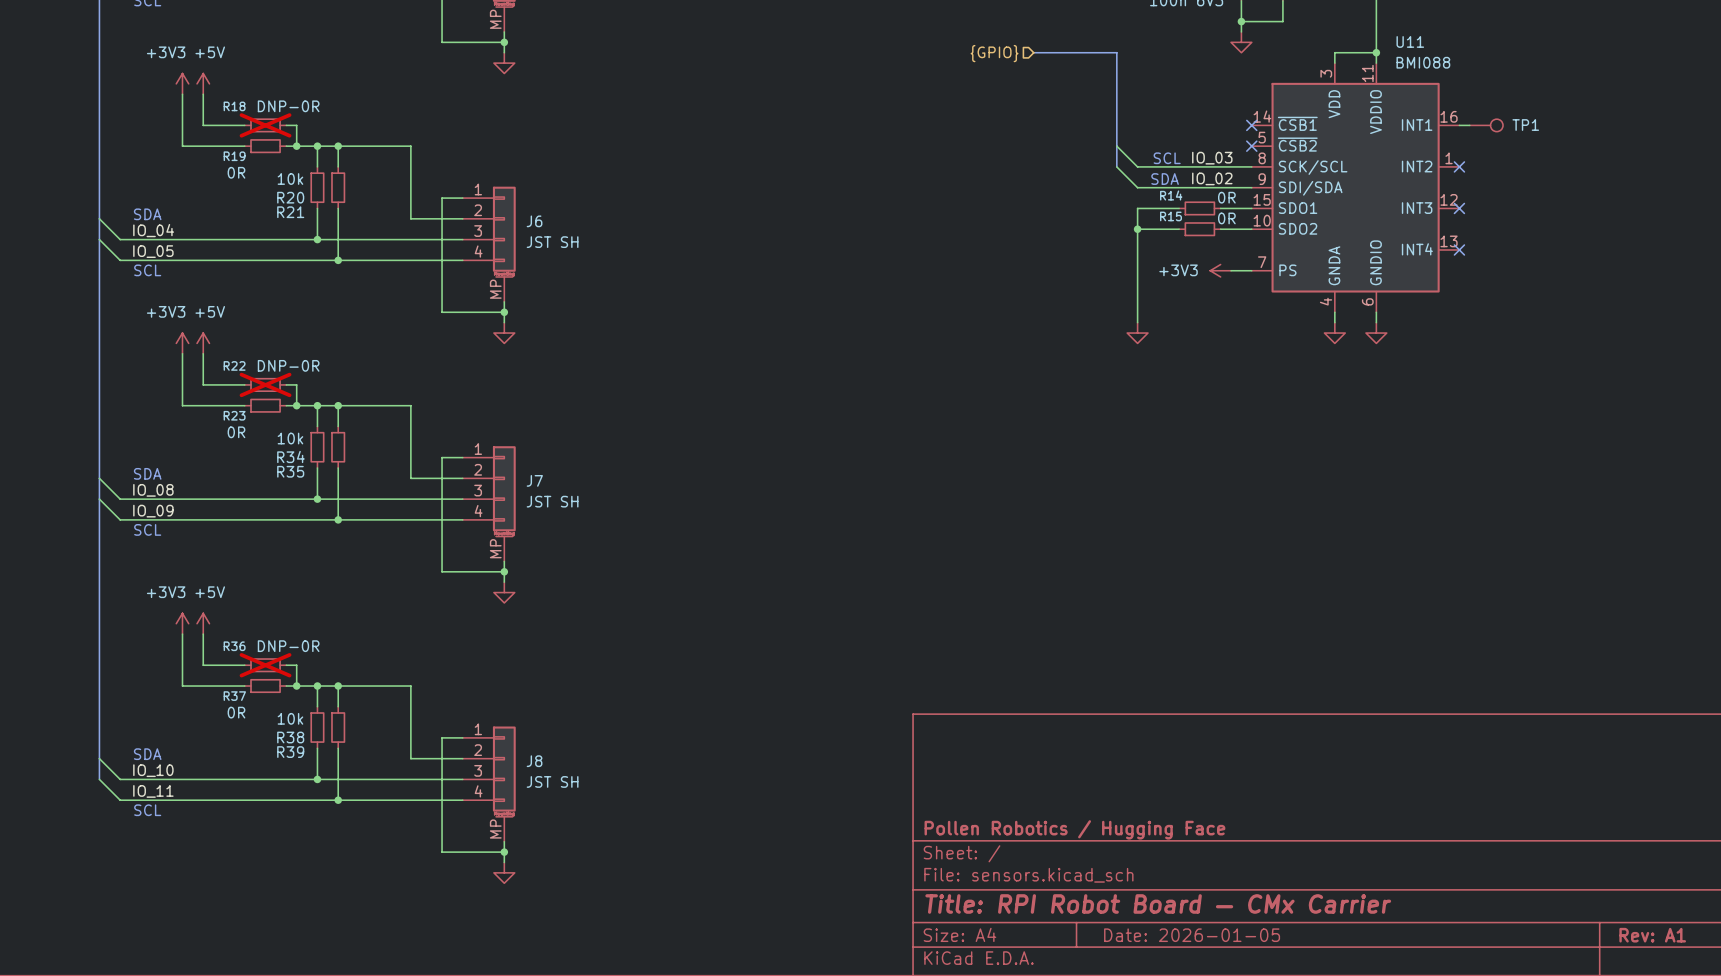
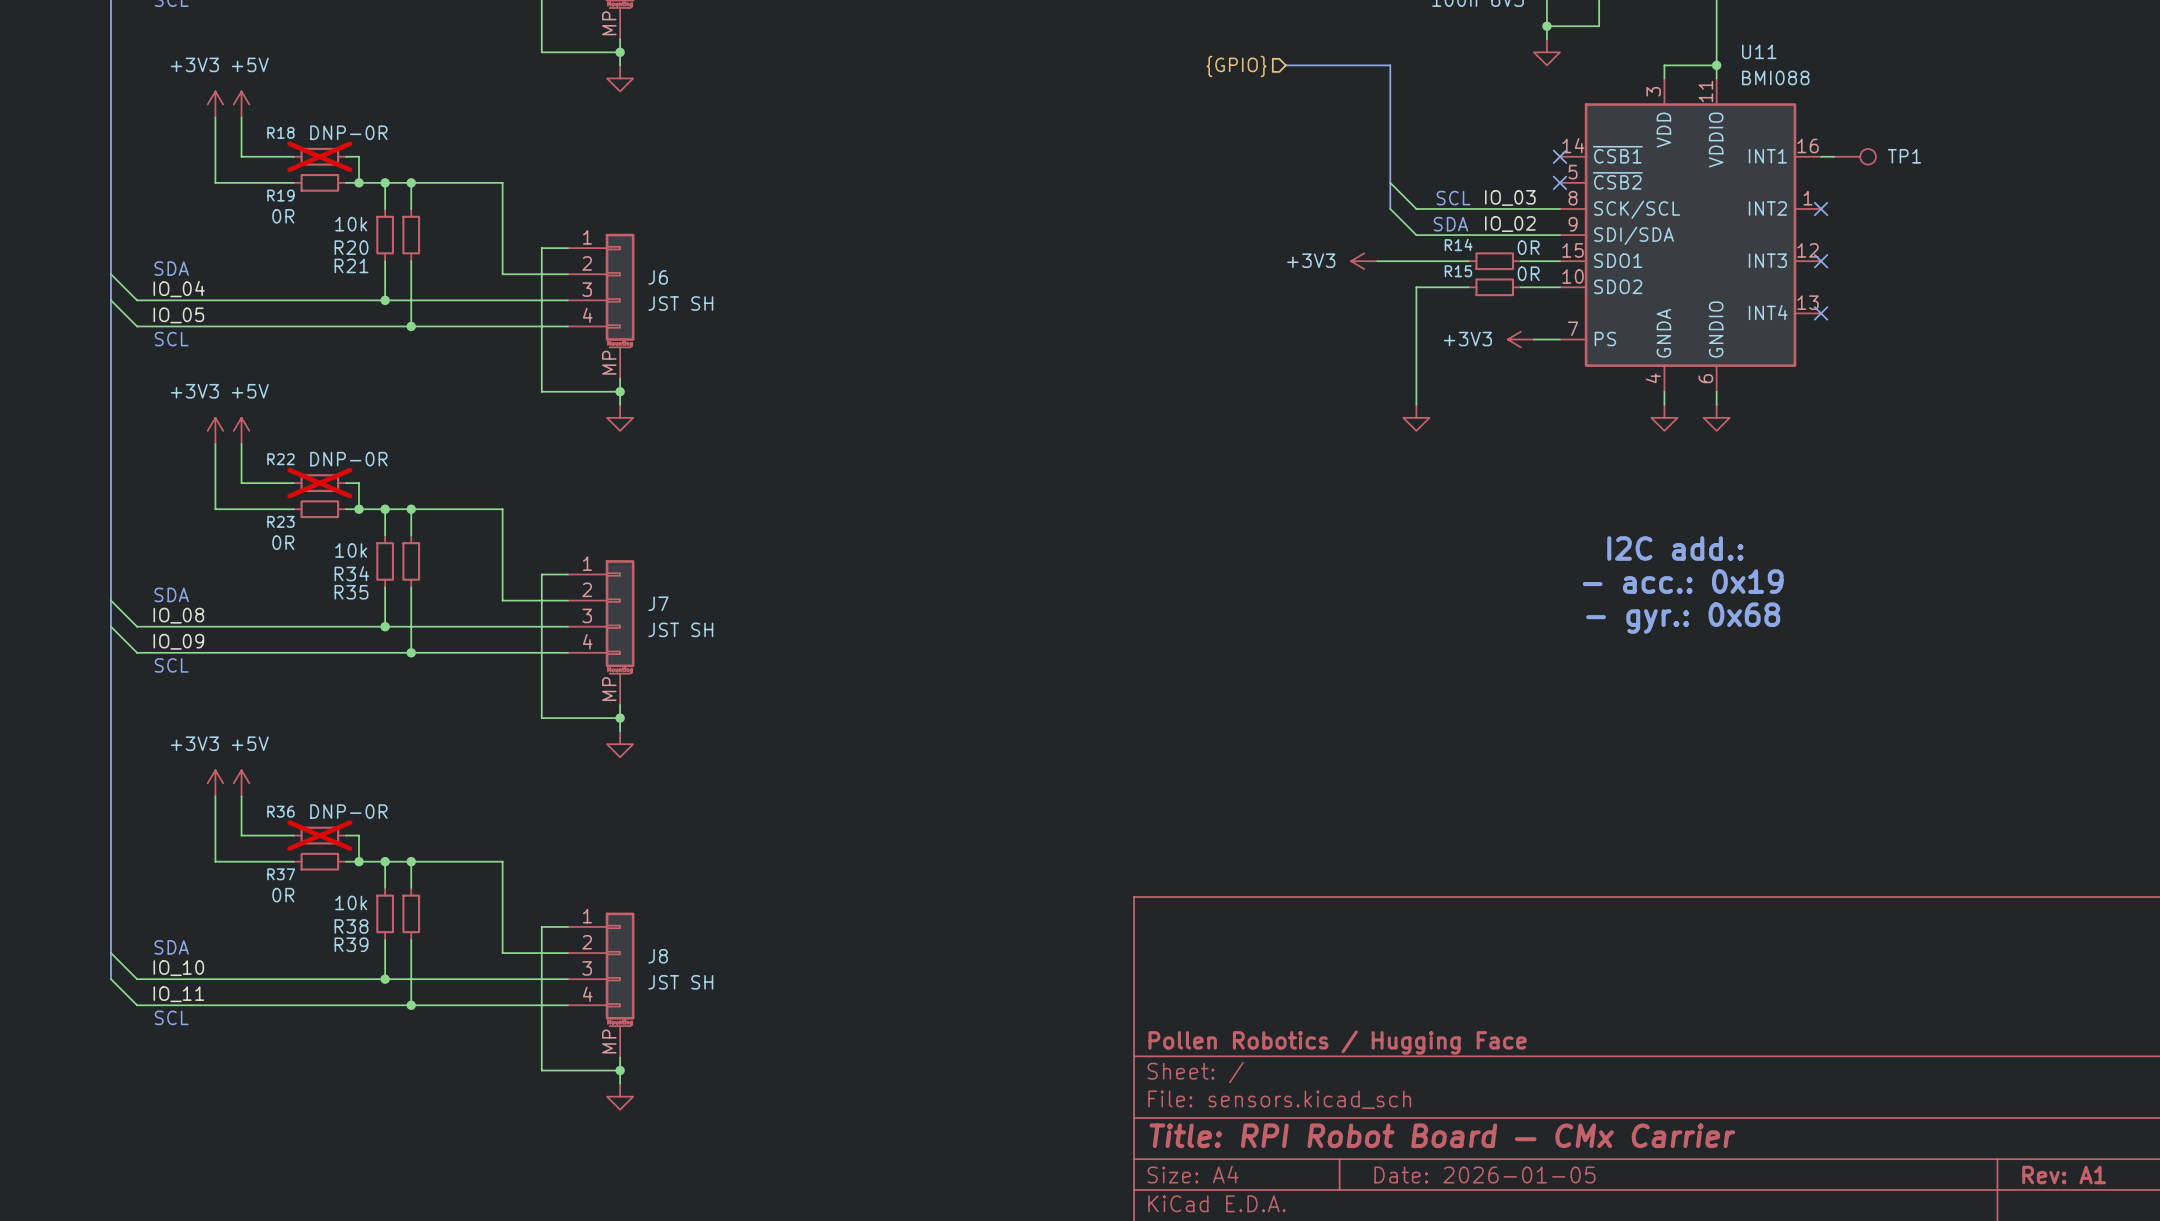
power symbol: none -> +3V3 (1364, 261)
wire: (1137, 208) (1137, 229) -> (1416, 261) (1377, 261)
junction: (1137, 229) -> none
text: none -> I2C add.: (1675, 548)
text: none -> - acc.: 0x19 (1683, 581)
text: none -> - gyr.: 0x68 (1683, 618)

